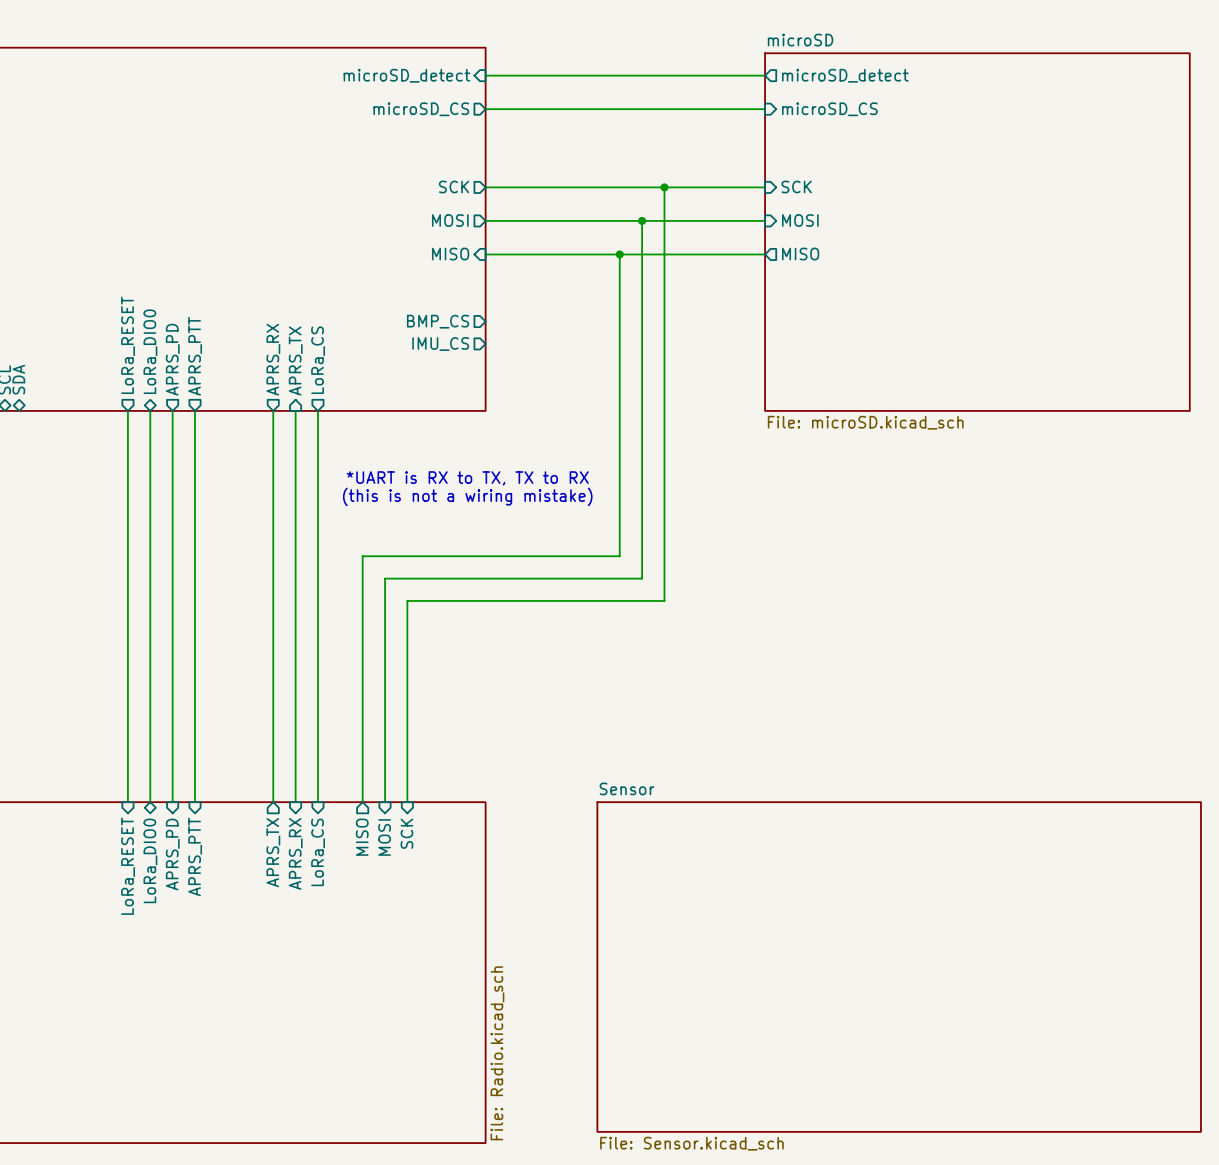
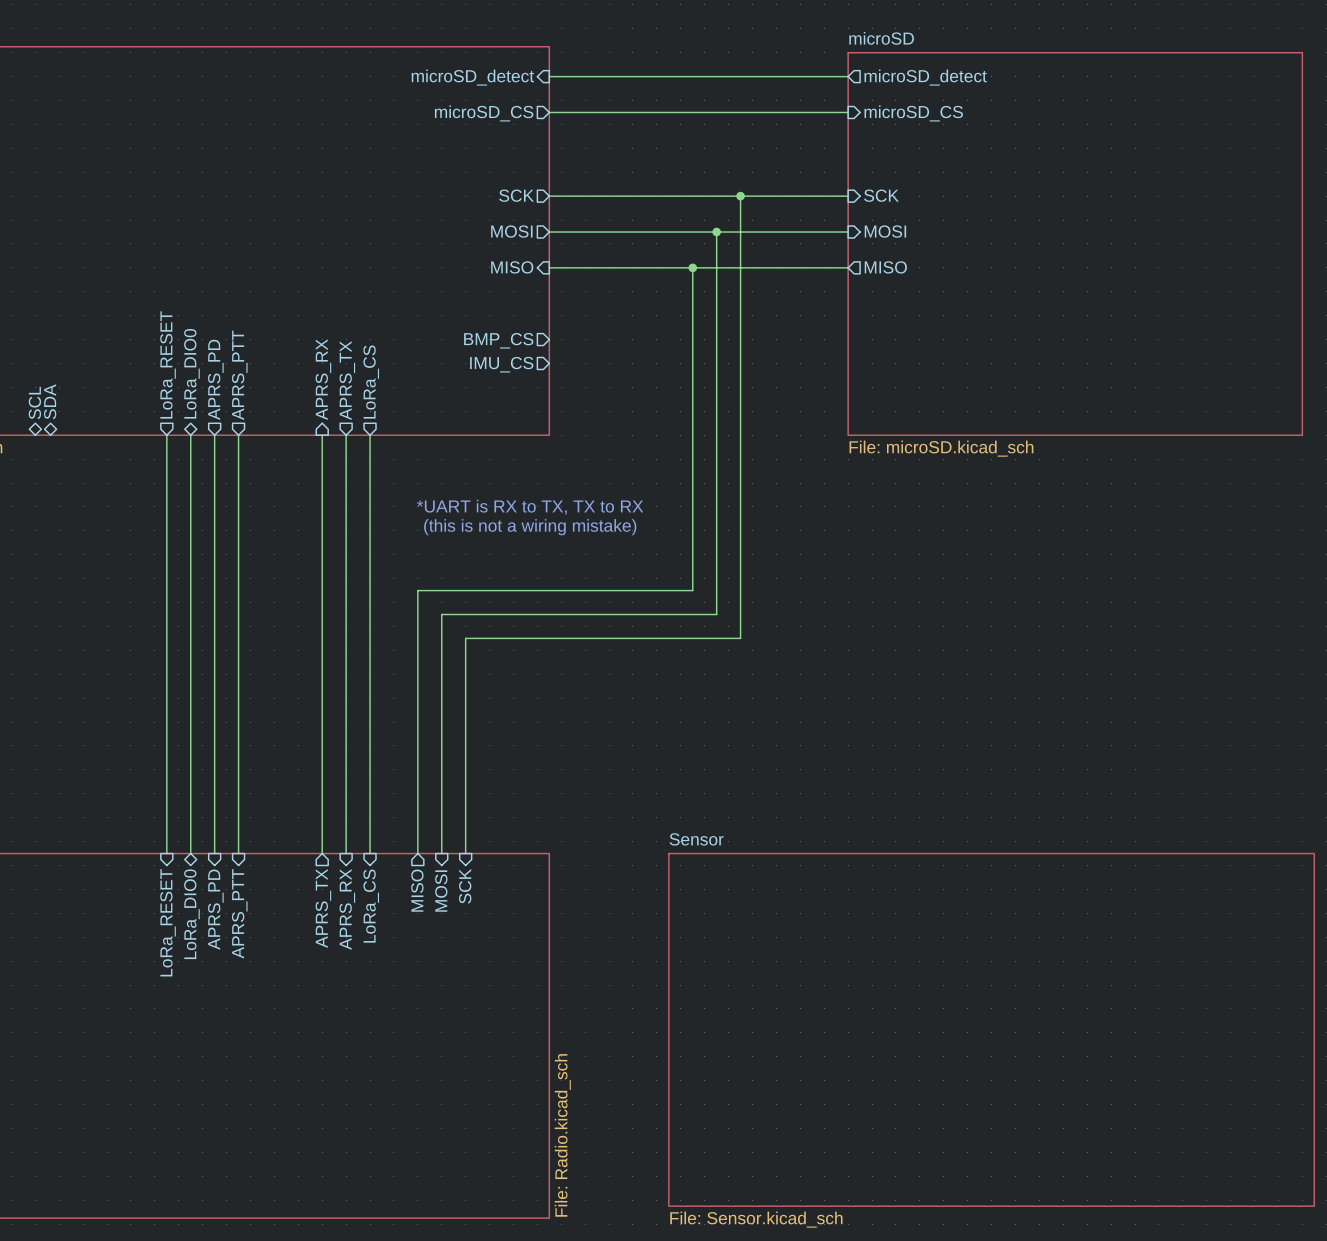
sheet pin shape: output (273, 359) -> input (323, 379)
sheet pin shape: input (295, 361) -> output (347, 380)

